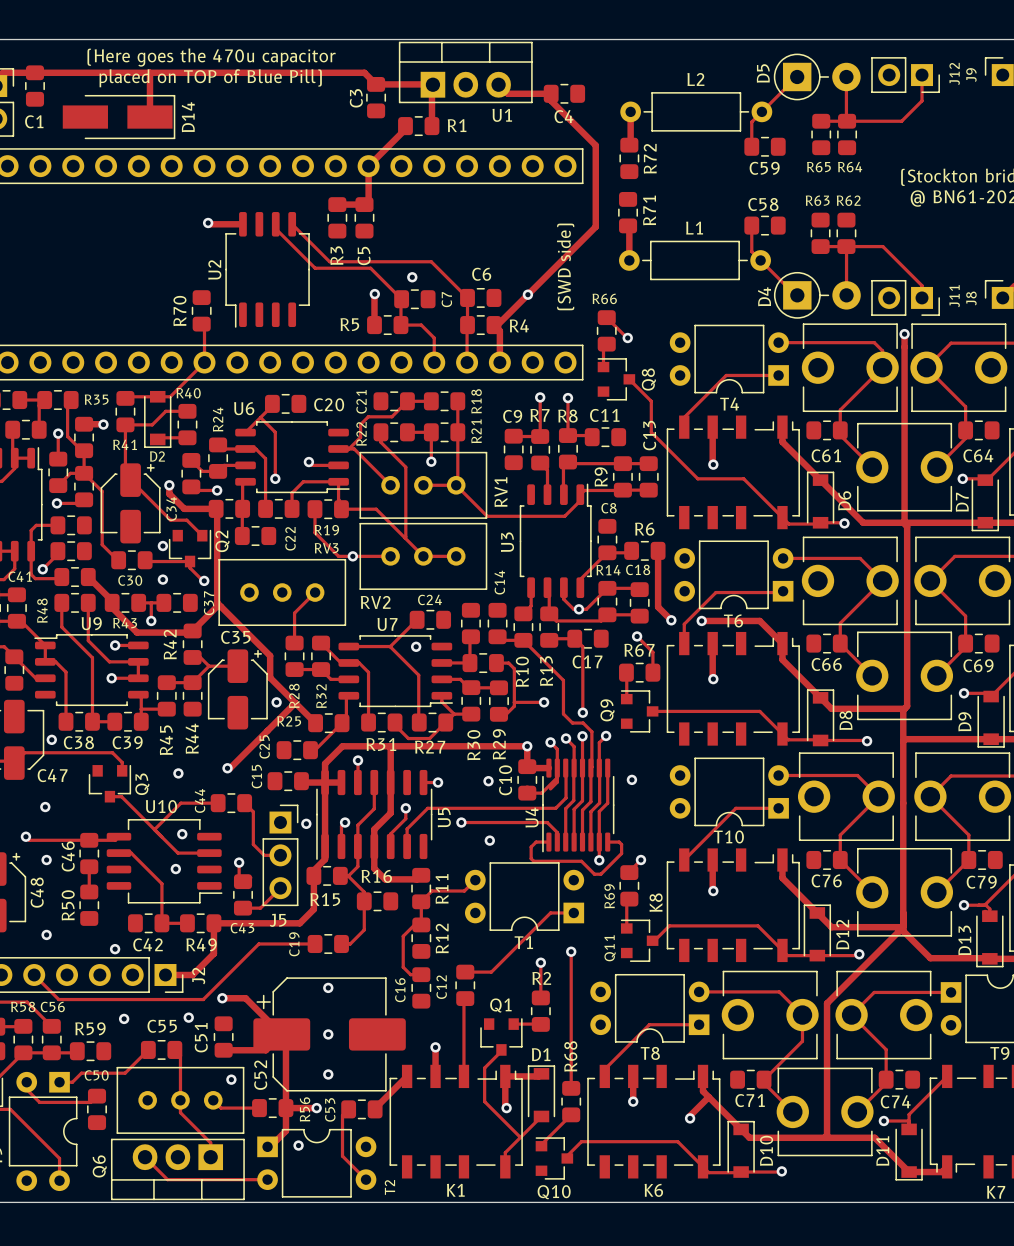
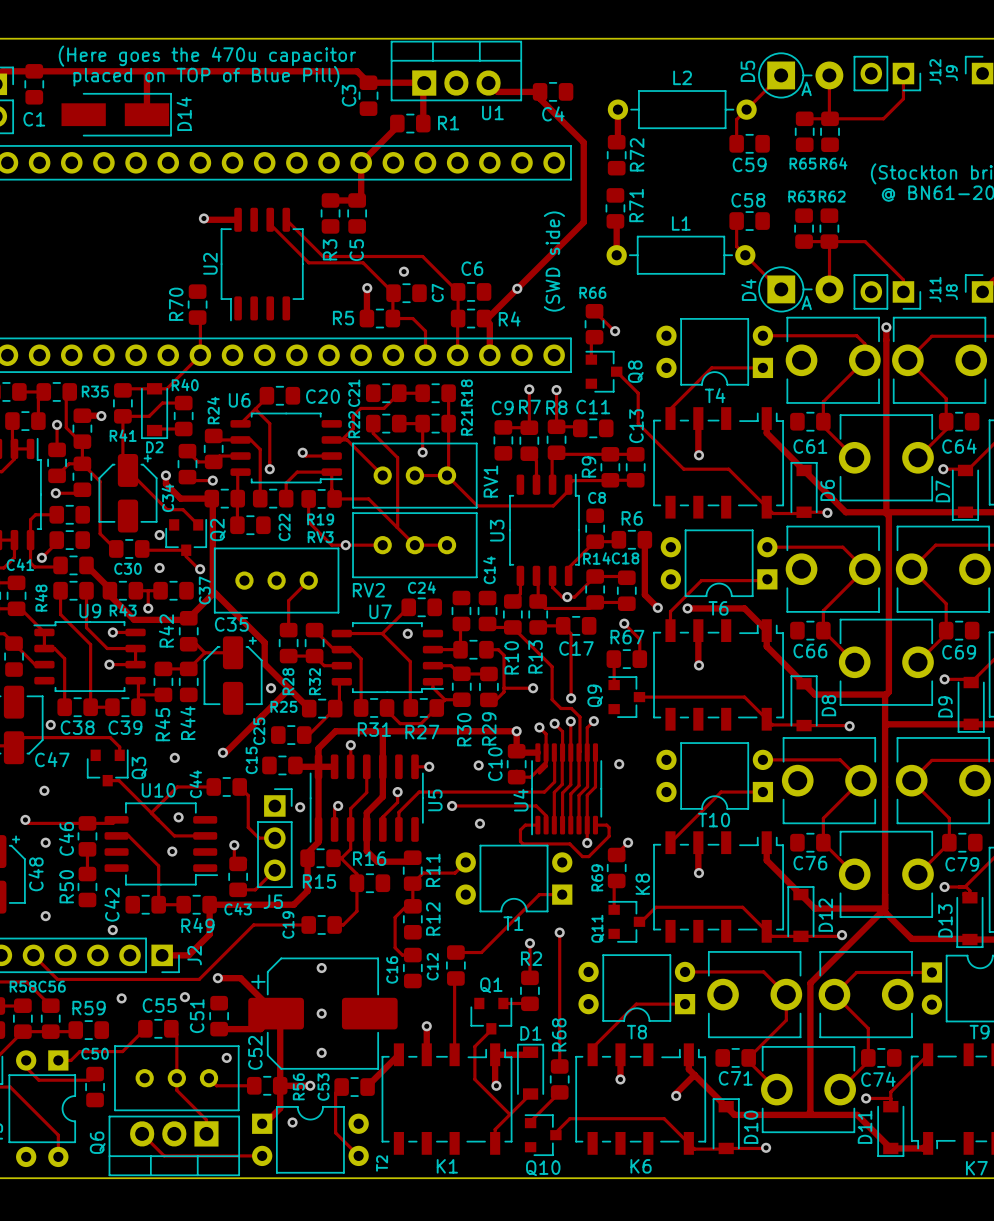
D5 text: none -> A (806, 88)
D4 text: none -> A (806, 302)
C42 name rotation: 0° (148, 944) -> 90° counterclockwise (112, 904)

